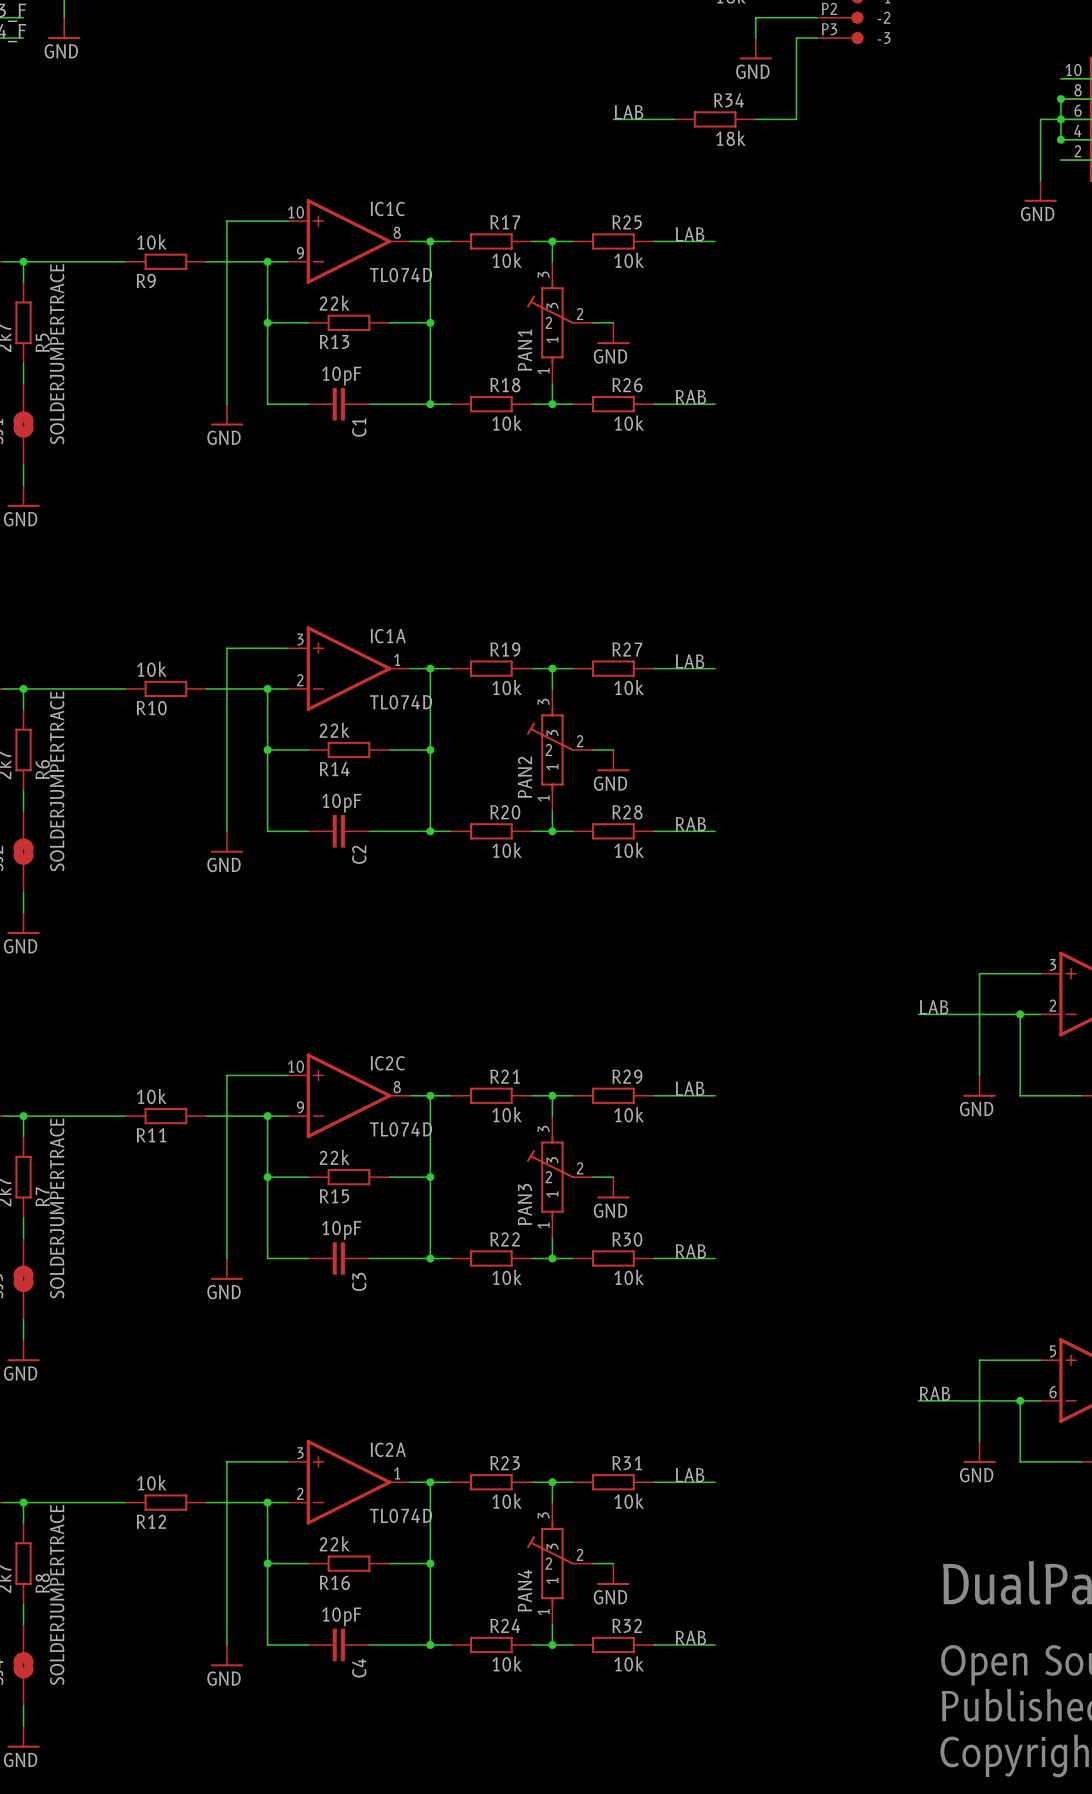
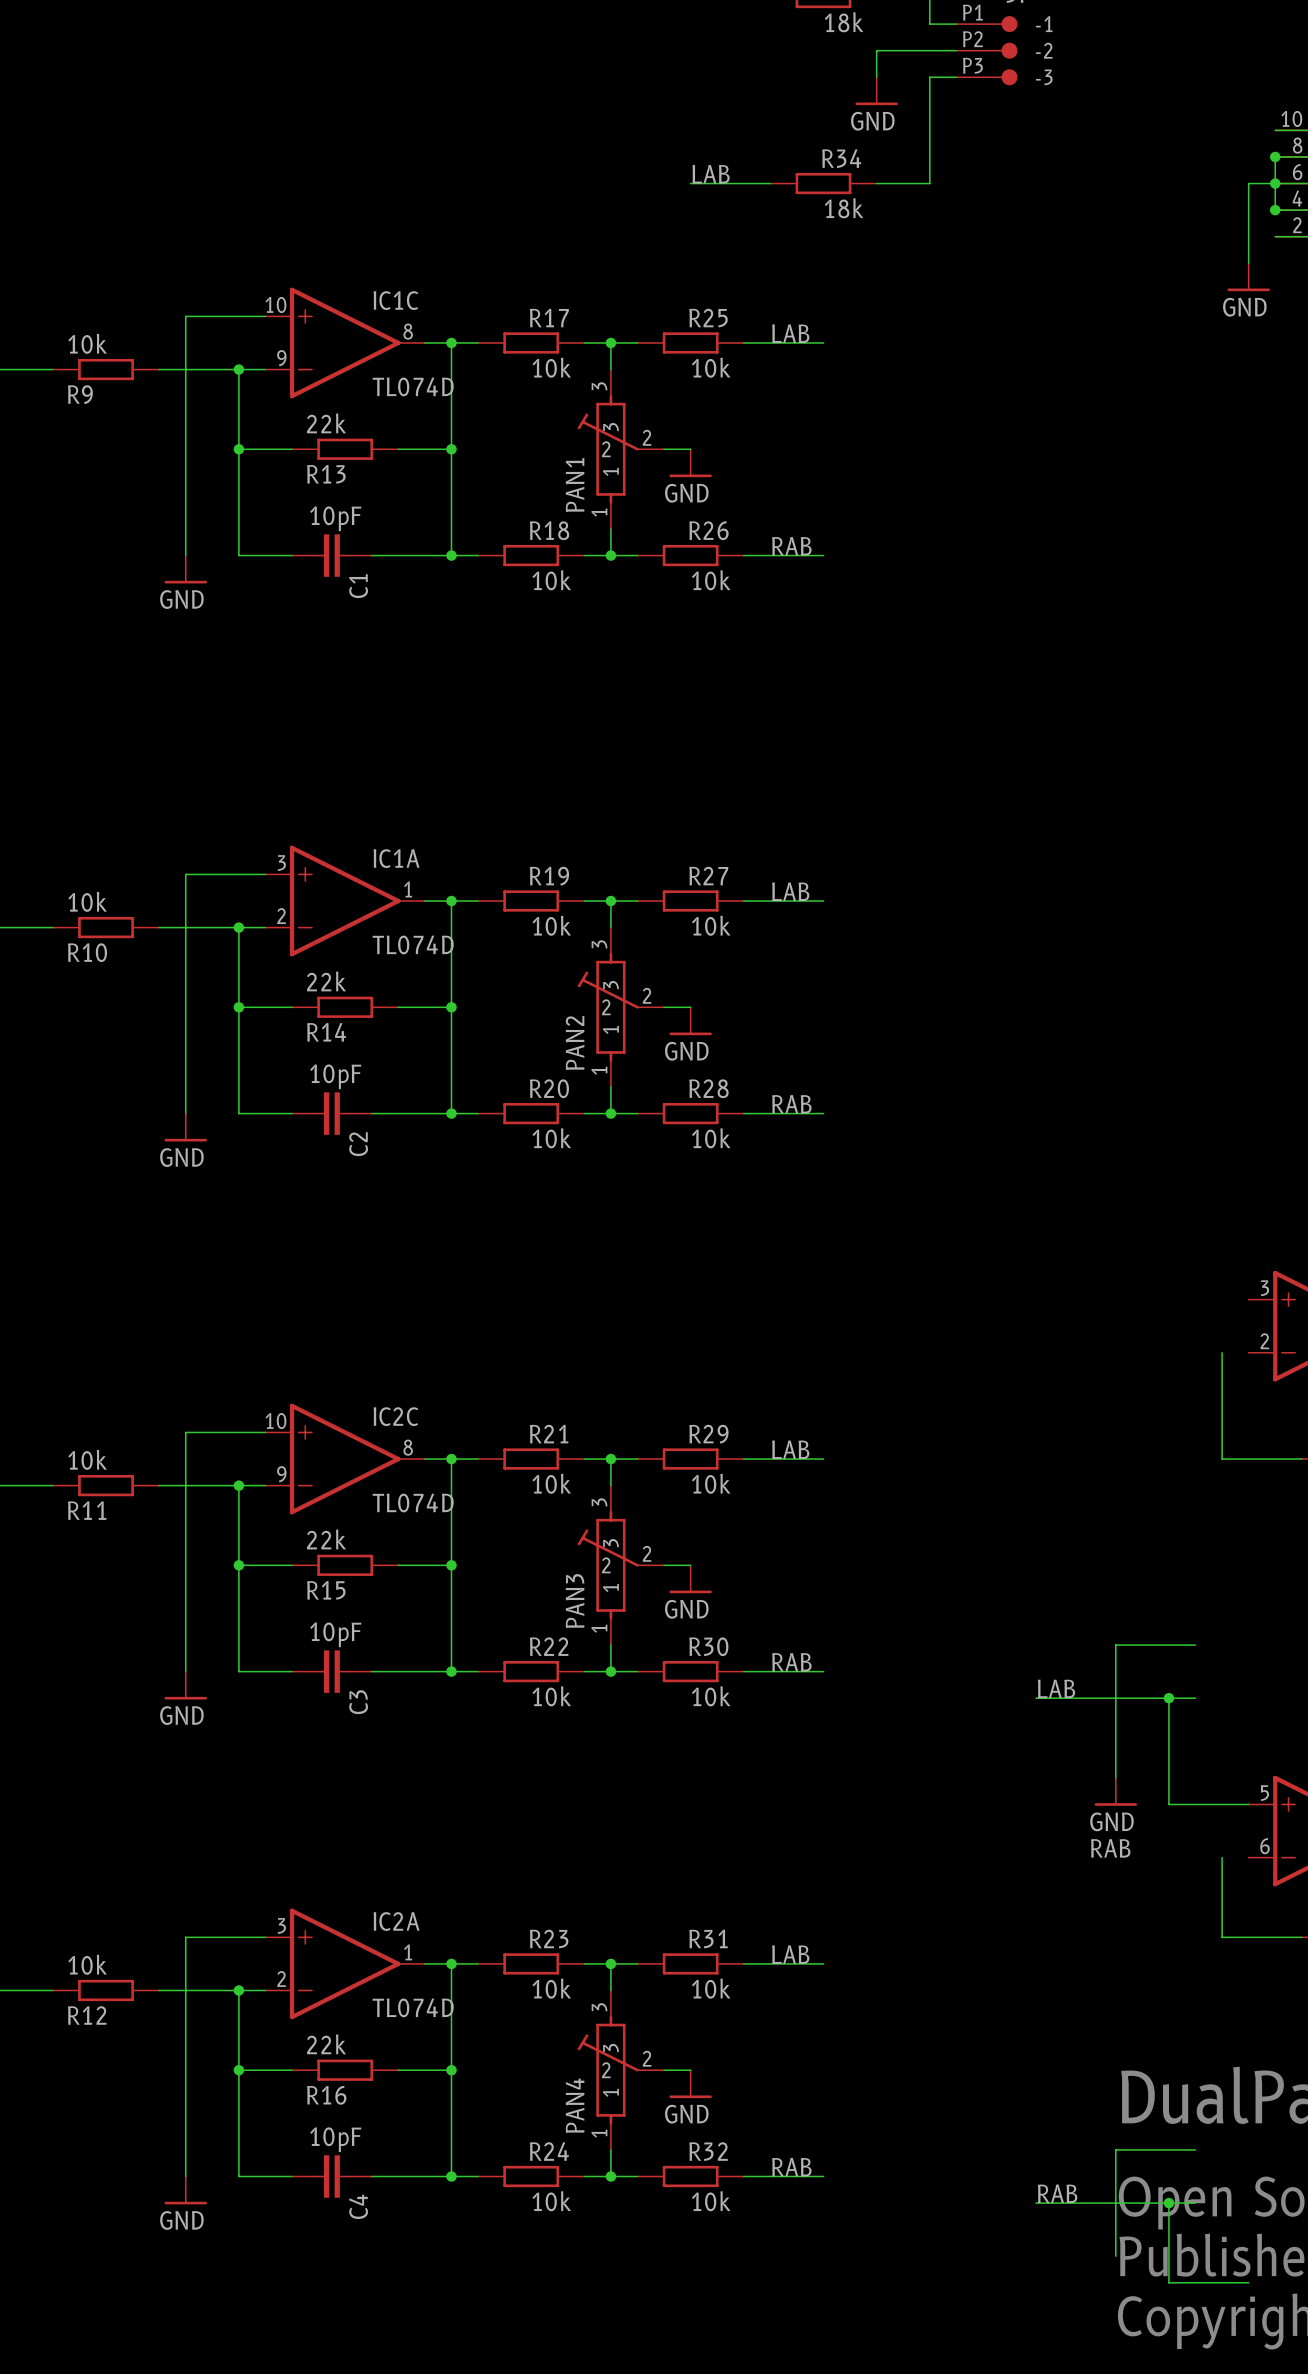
wire: (1040, 973) (979, 973) (979, 1075) -> none
label: LAB (934, 1007) -> none
wire: (918, 1014) (1040, 1014) -> none
junction: (1020, 1014) -> none
power symbol: GND (979, 1086) -> none
wire: none -> (1195, 1645) (1115, 1645) (1115, 1777)
label: none -> LAB (1056, 1688)
junction: none -> (1168, 1698)
wire: (979, 1360) (979, 1441) -> (1168, 1804) (1168, 1698)
wire: (918, 1400) (1040, 1400) -> (1036, 1698) (1195, 1698)
junction: (1020, 1400) -> none
power symbol position: GND (979, 1452) -> GND (1115, 1791)
wire: none -> (1195, 2149) (1115, 2149) (1115, 2256)
label: none -> RAB (1057, 2193)
wire: none -> (1036, 2203) (1195, 2203)
wire: none -> (1168, 2203) (1168, 2282) (1248, 2282)
junction: none -> (1168, 2203)

